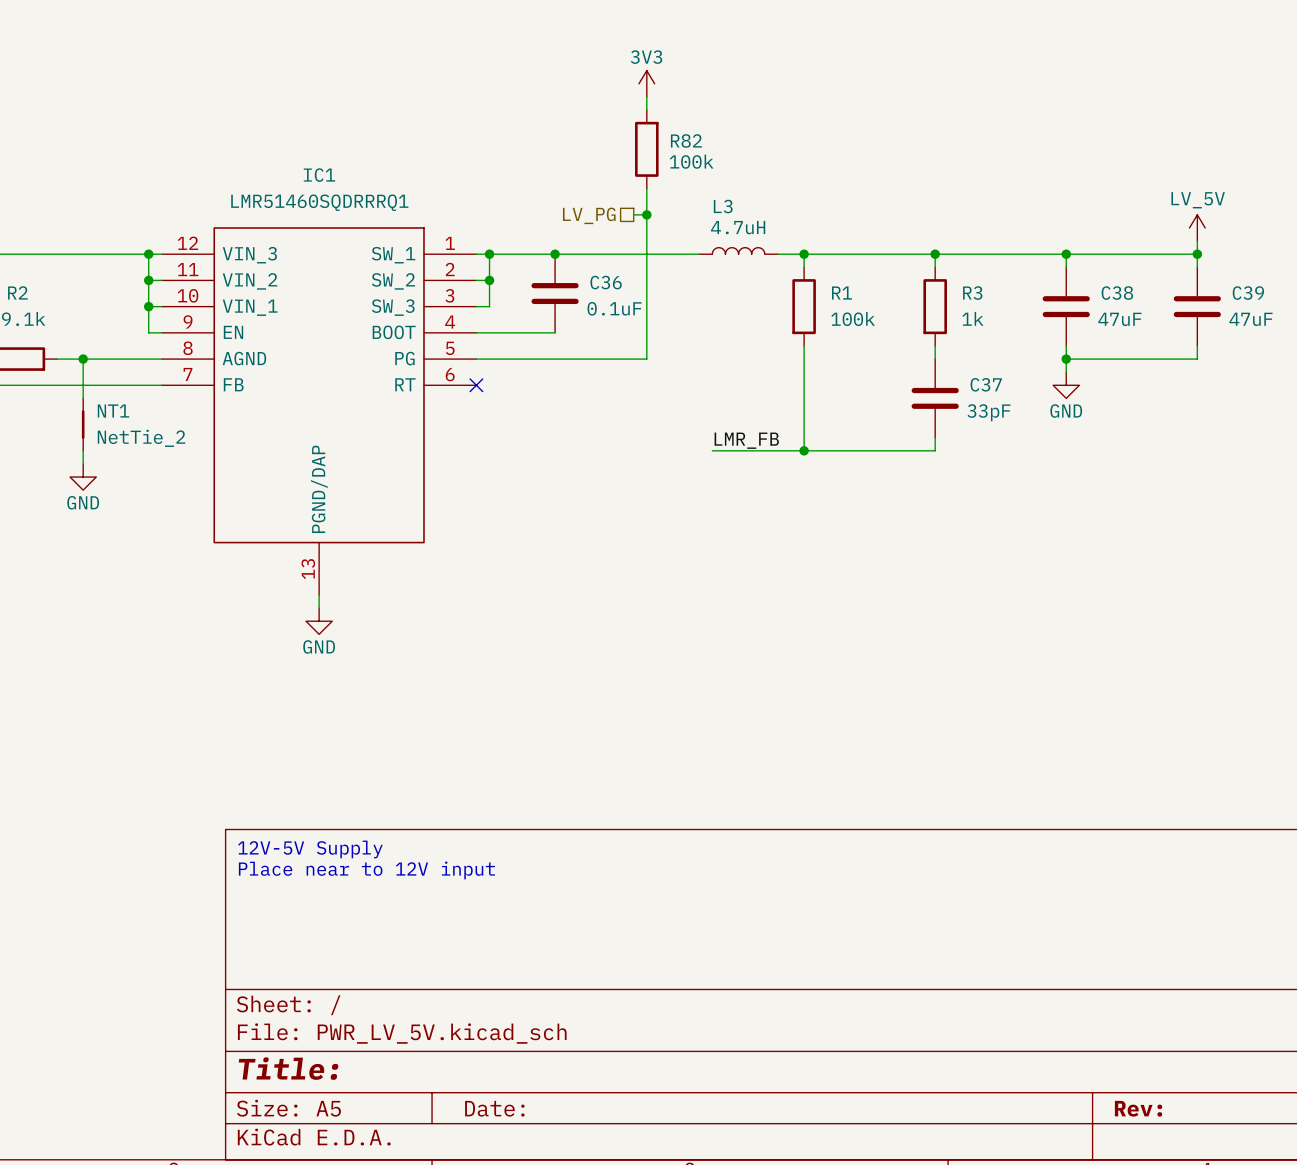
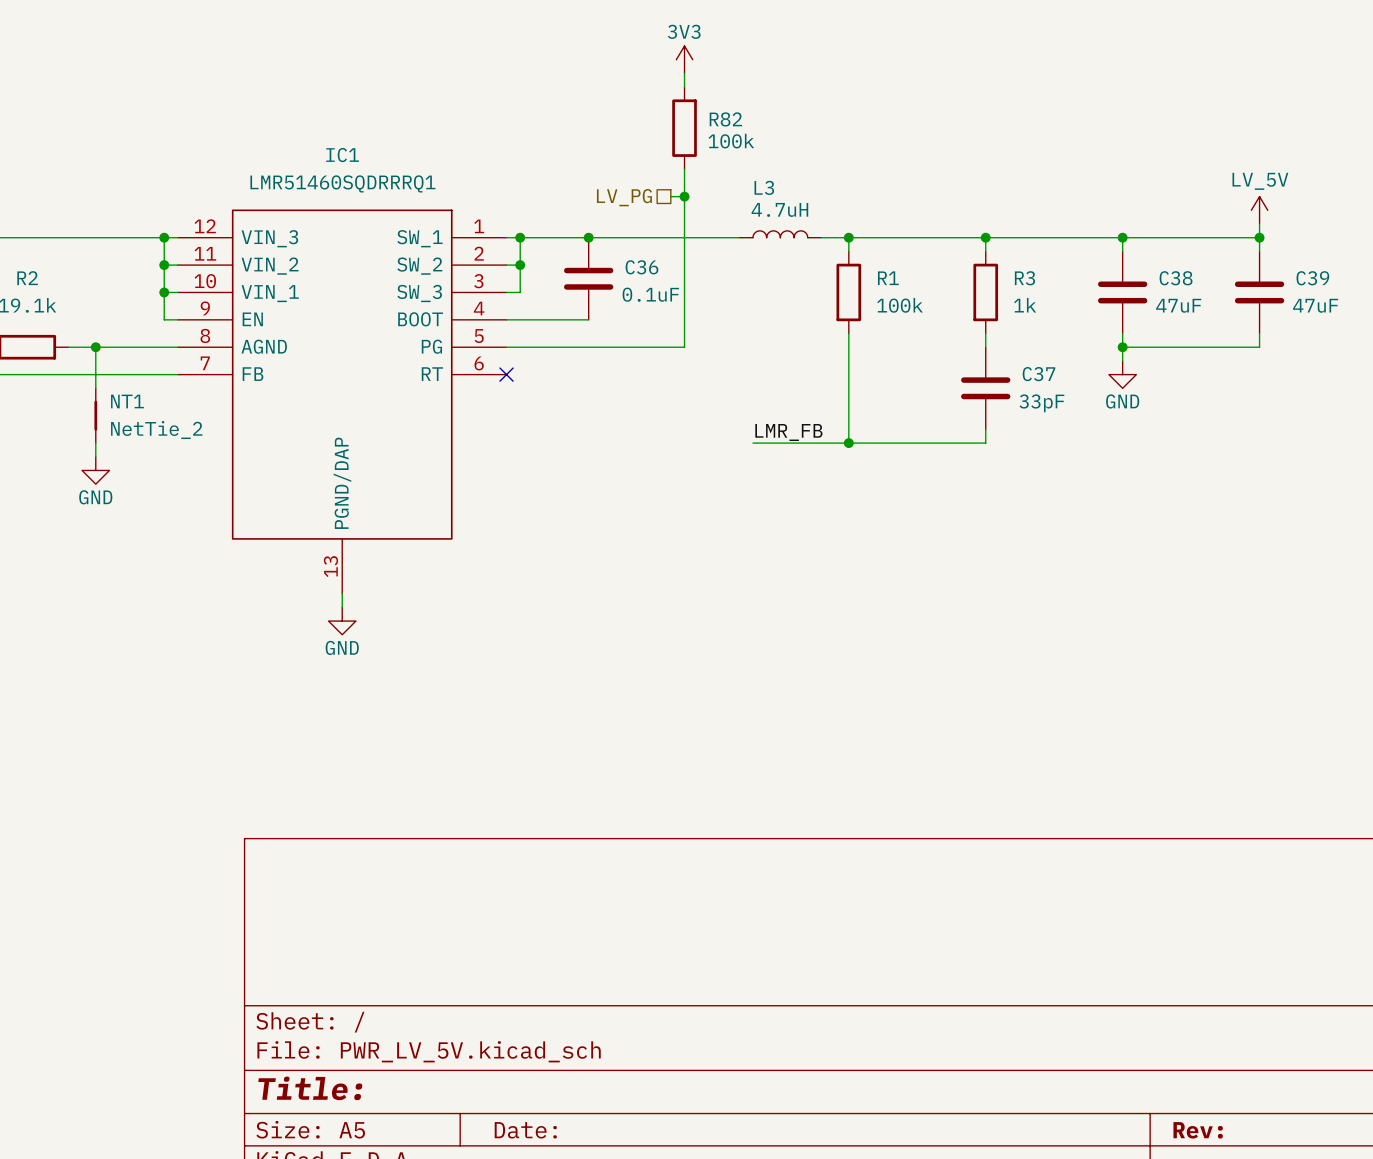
text: 12V-5V Supply (310, 849) -> none
text: Place near to 12V input (366, 870) -> none

